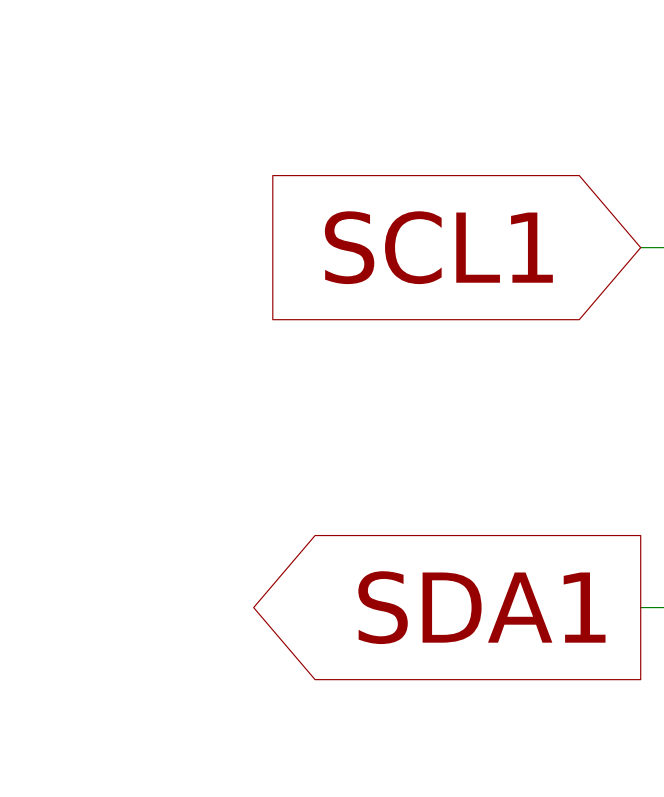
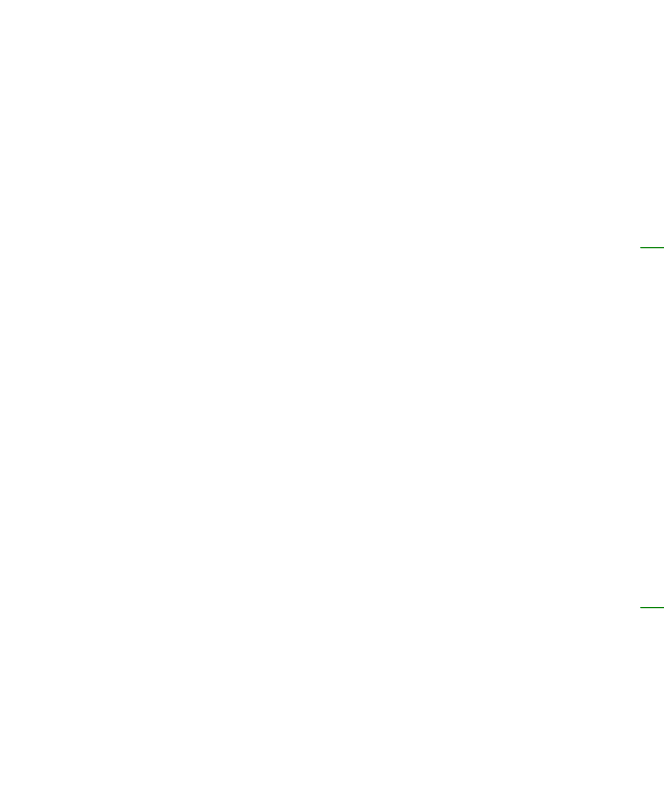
global label: SCL1 (438, 247) -> none
global label: SDA1 (481, 607) -> none

